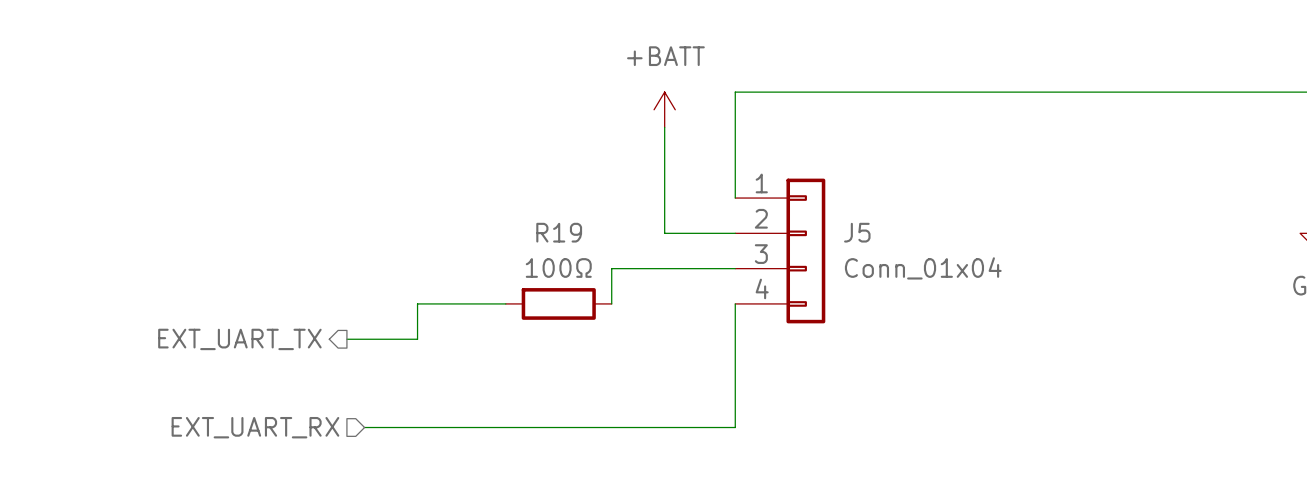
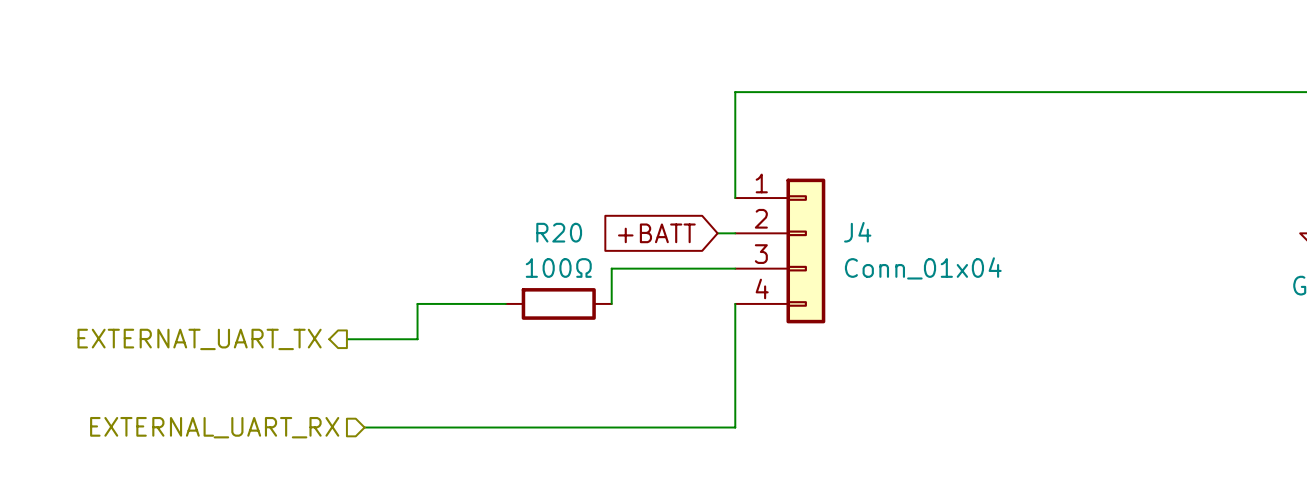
power symbol: +BATT (664, 109) -> none
wire: (664, 127) (664, 233) (717, 233) -> none
R19 name: R19 (559, 232) -> R20 (559, 232)
J5 name: J5 (857, 232) -> J4 (857, 232)
global label: none -> +BATT (656, 233)
hierarchical label: EXT_UART_TX (239, 339) -> EXTERNAT_UART_TX (199, 339)
hierarchical label: EXT_UART_RX (255, 427) -> EXTERNAL_UART_RX (214, 427)

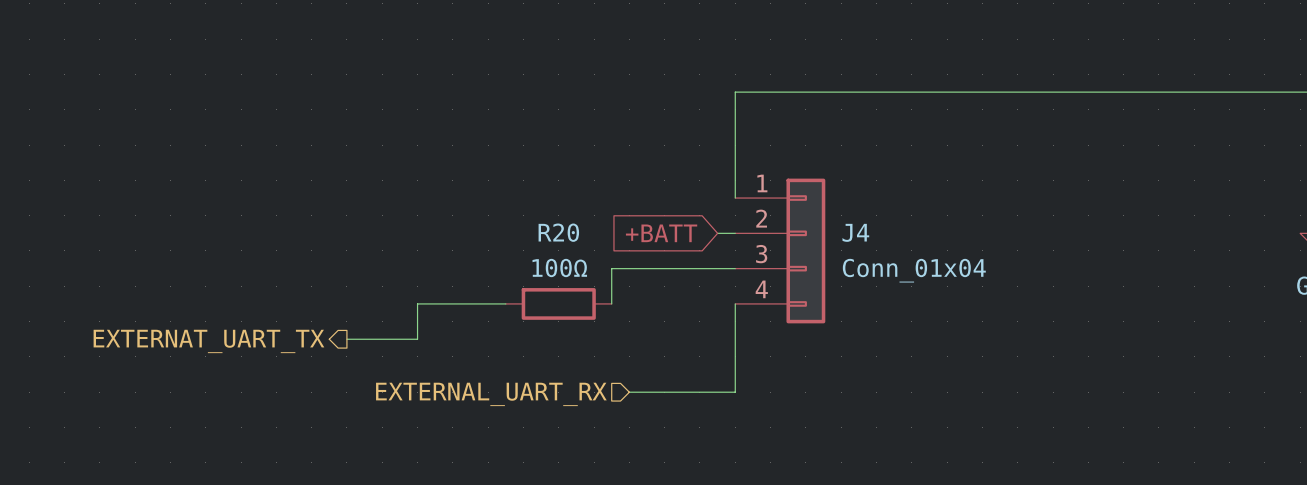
wire: (735, 392) (735, 427) (364, 427) -> (735, 392) (629, 392)
hierarchical label position: EXTERNAL_UART_RX (214, 427) -> EXTERNAL_UART_RX (491, 394)

